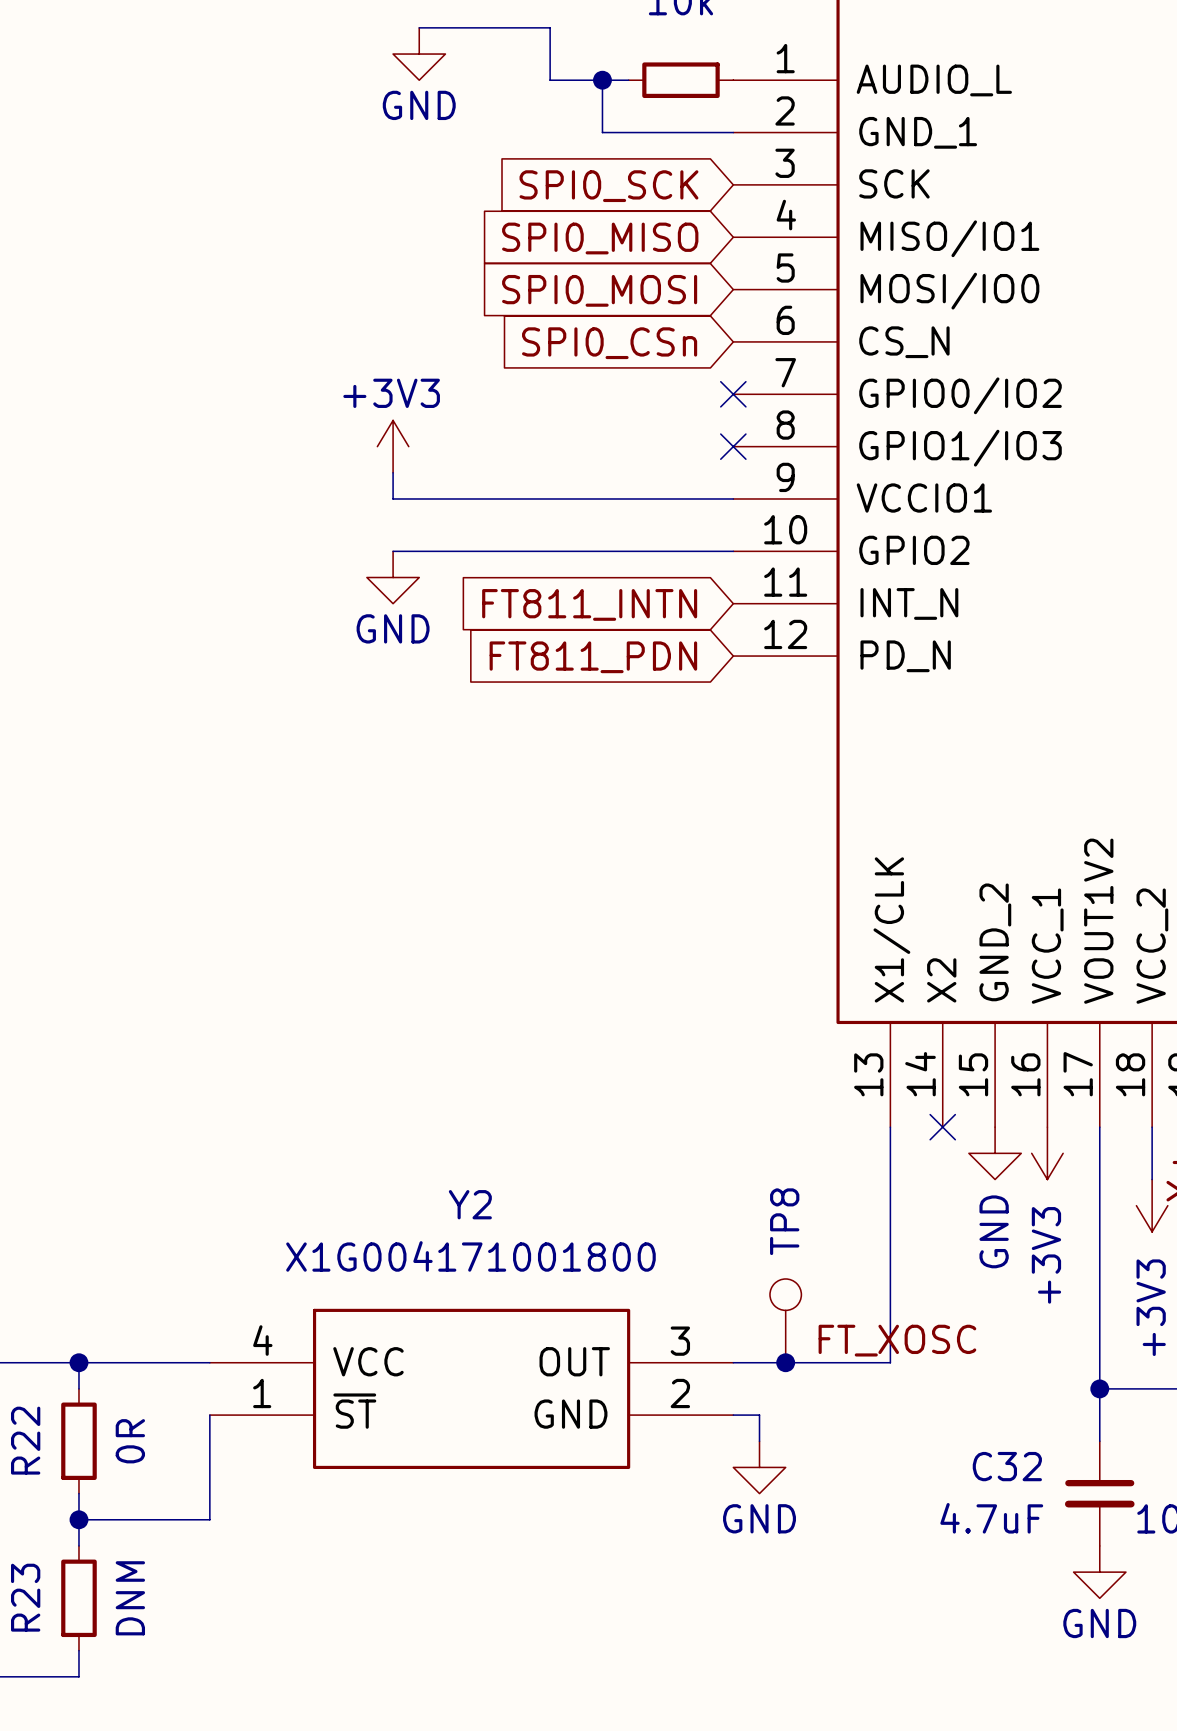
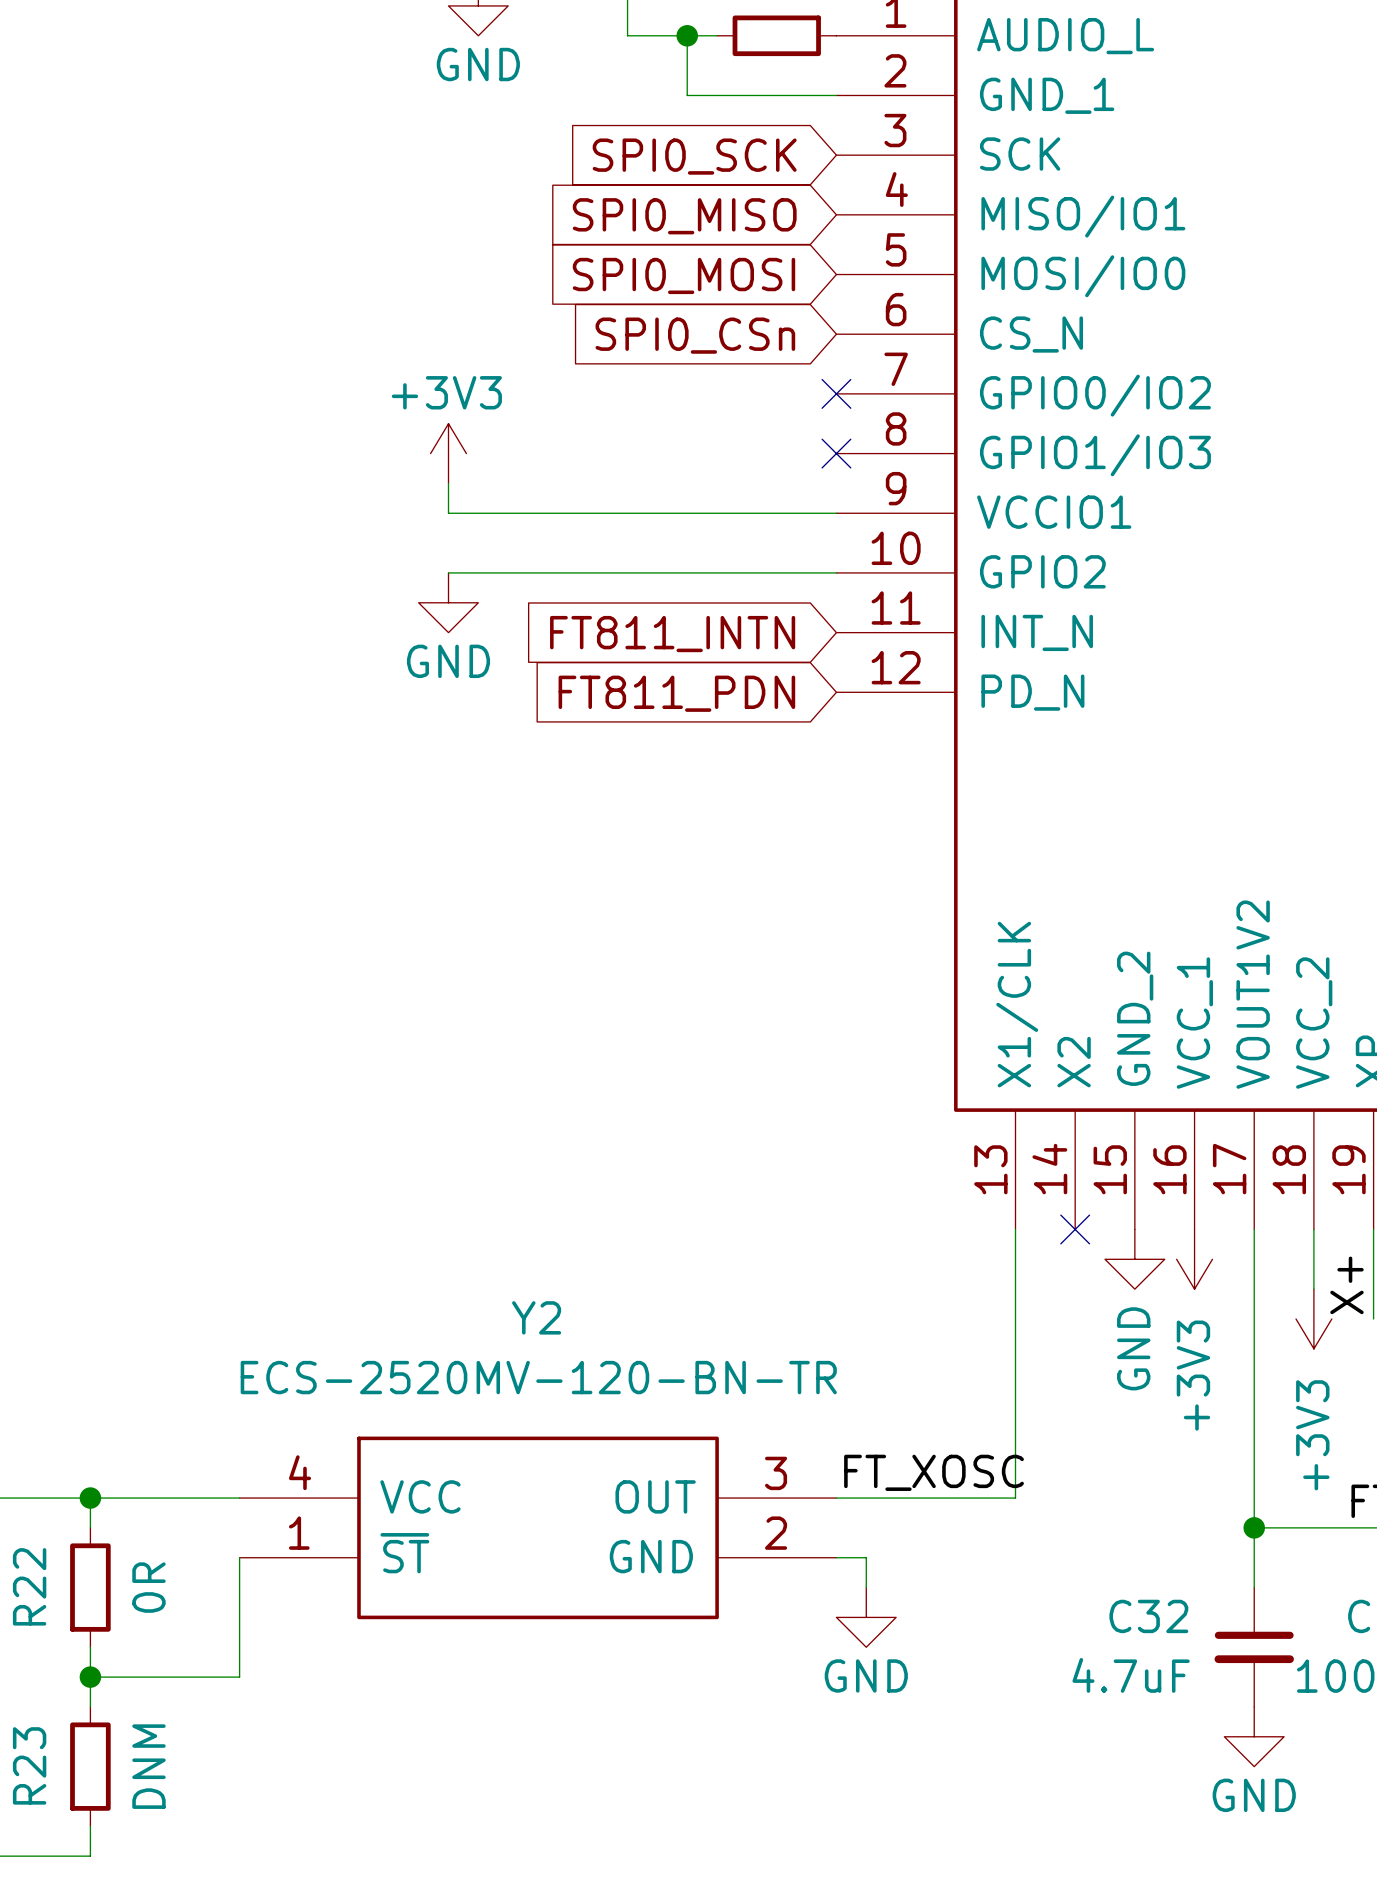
Y2 value: X1G004171001800 (470, 1256) -> ECS-2520MV-120-BN-TR (538, 1377)
TP8: (785, 1320) -> none
label position: FT_XOSC (897, 1340) -> FT_XOSC (934, 1472)
junction: (785, 1362) -> none

